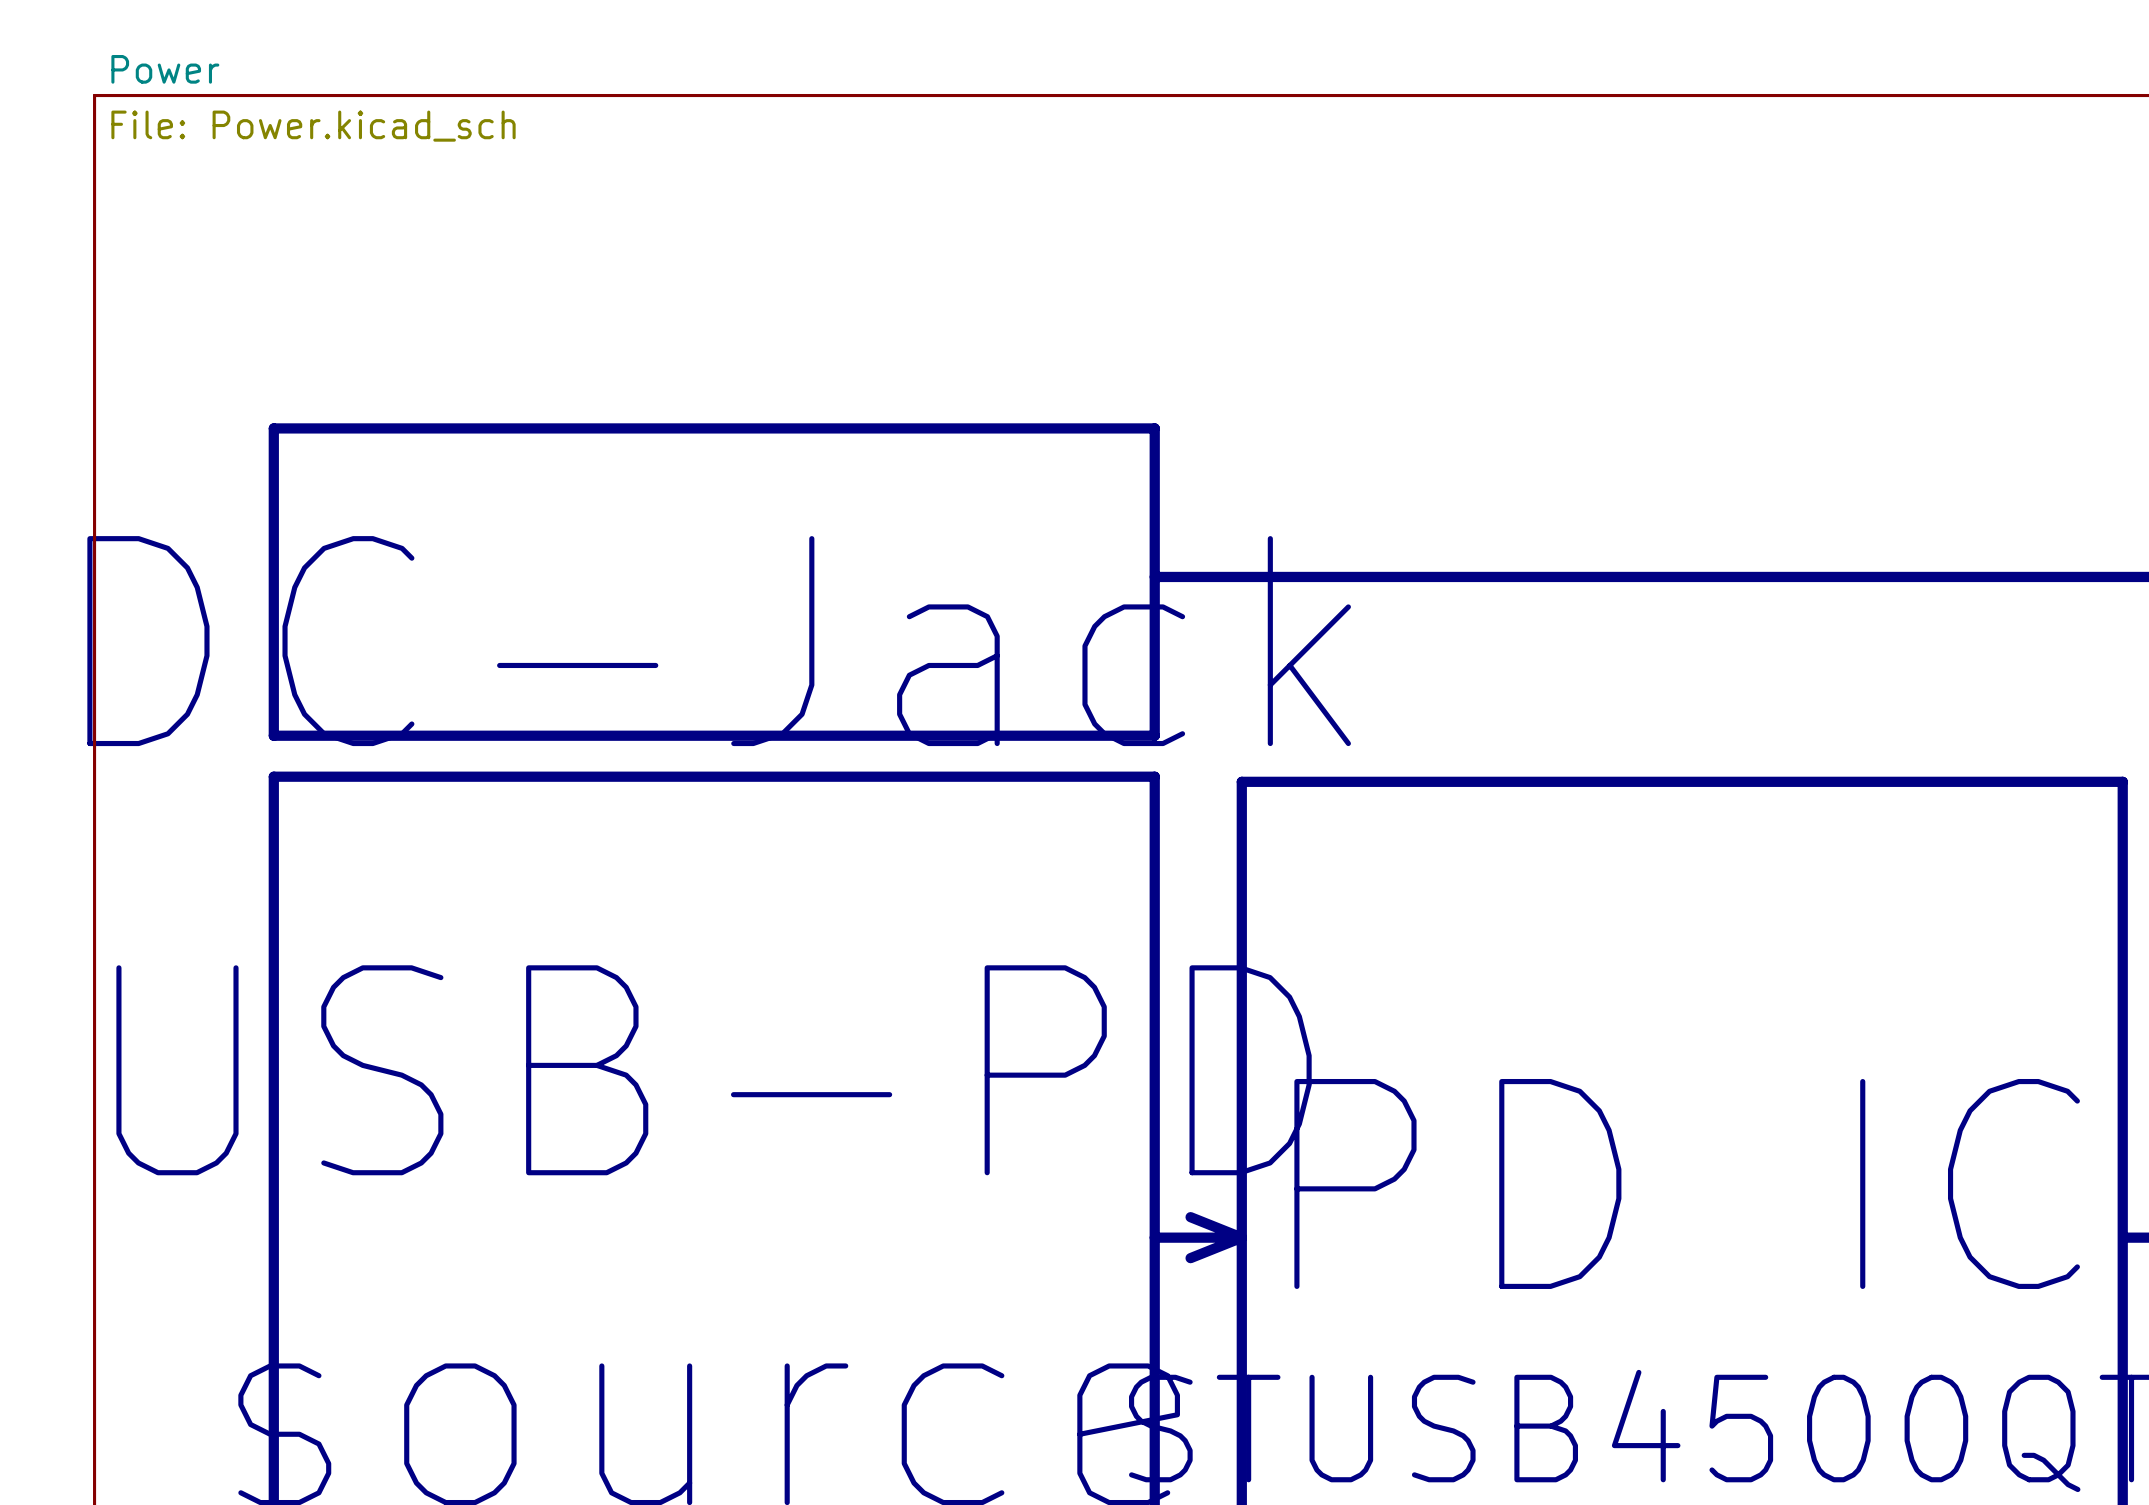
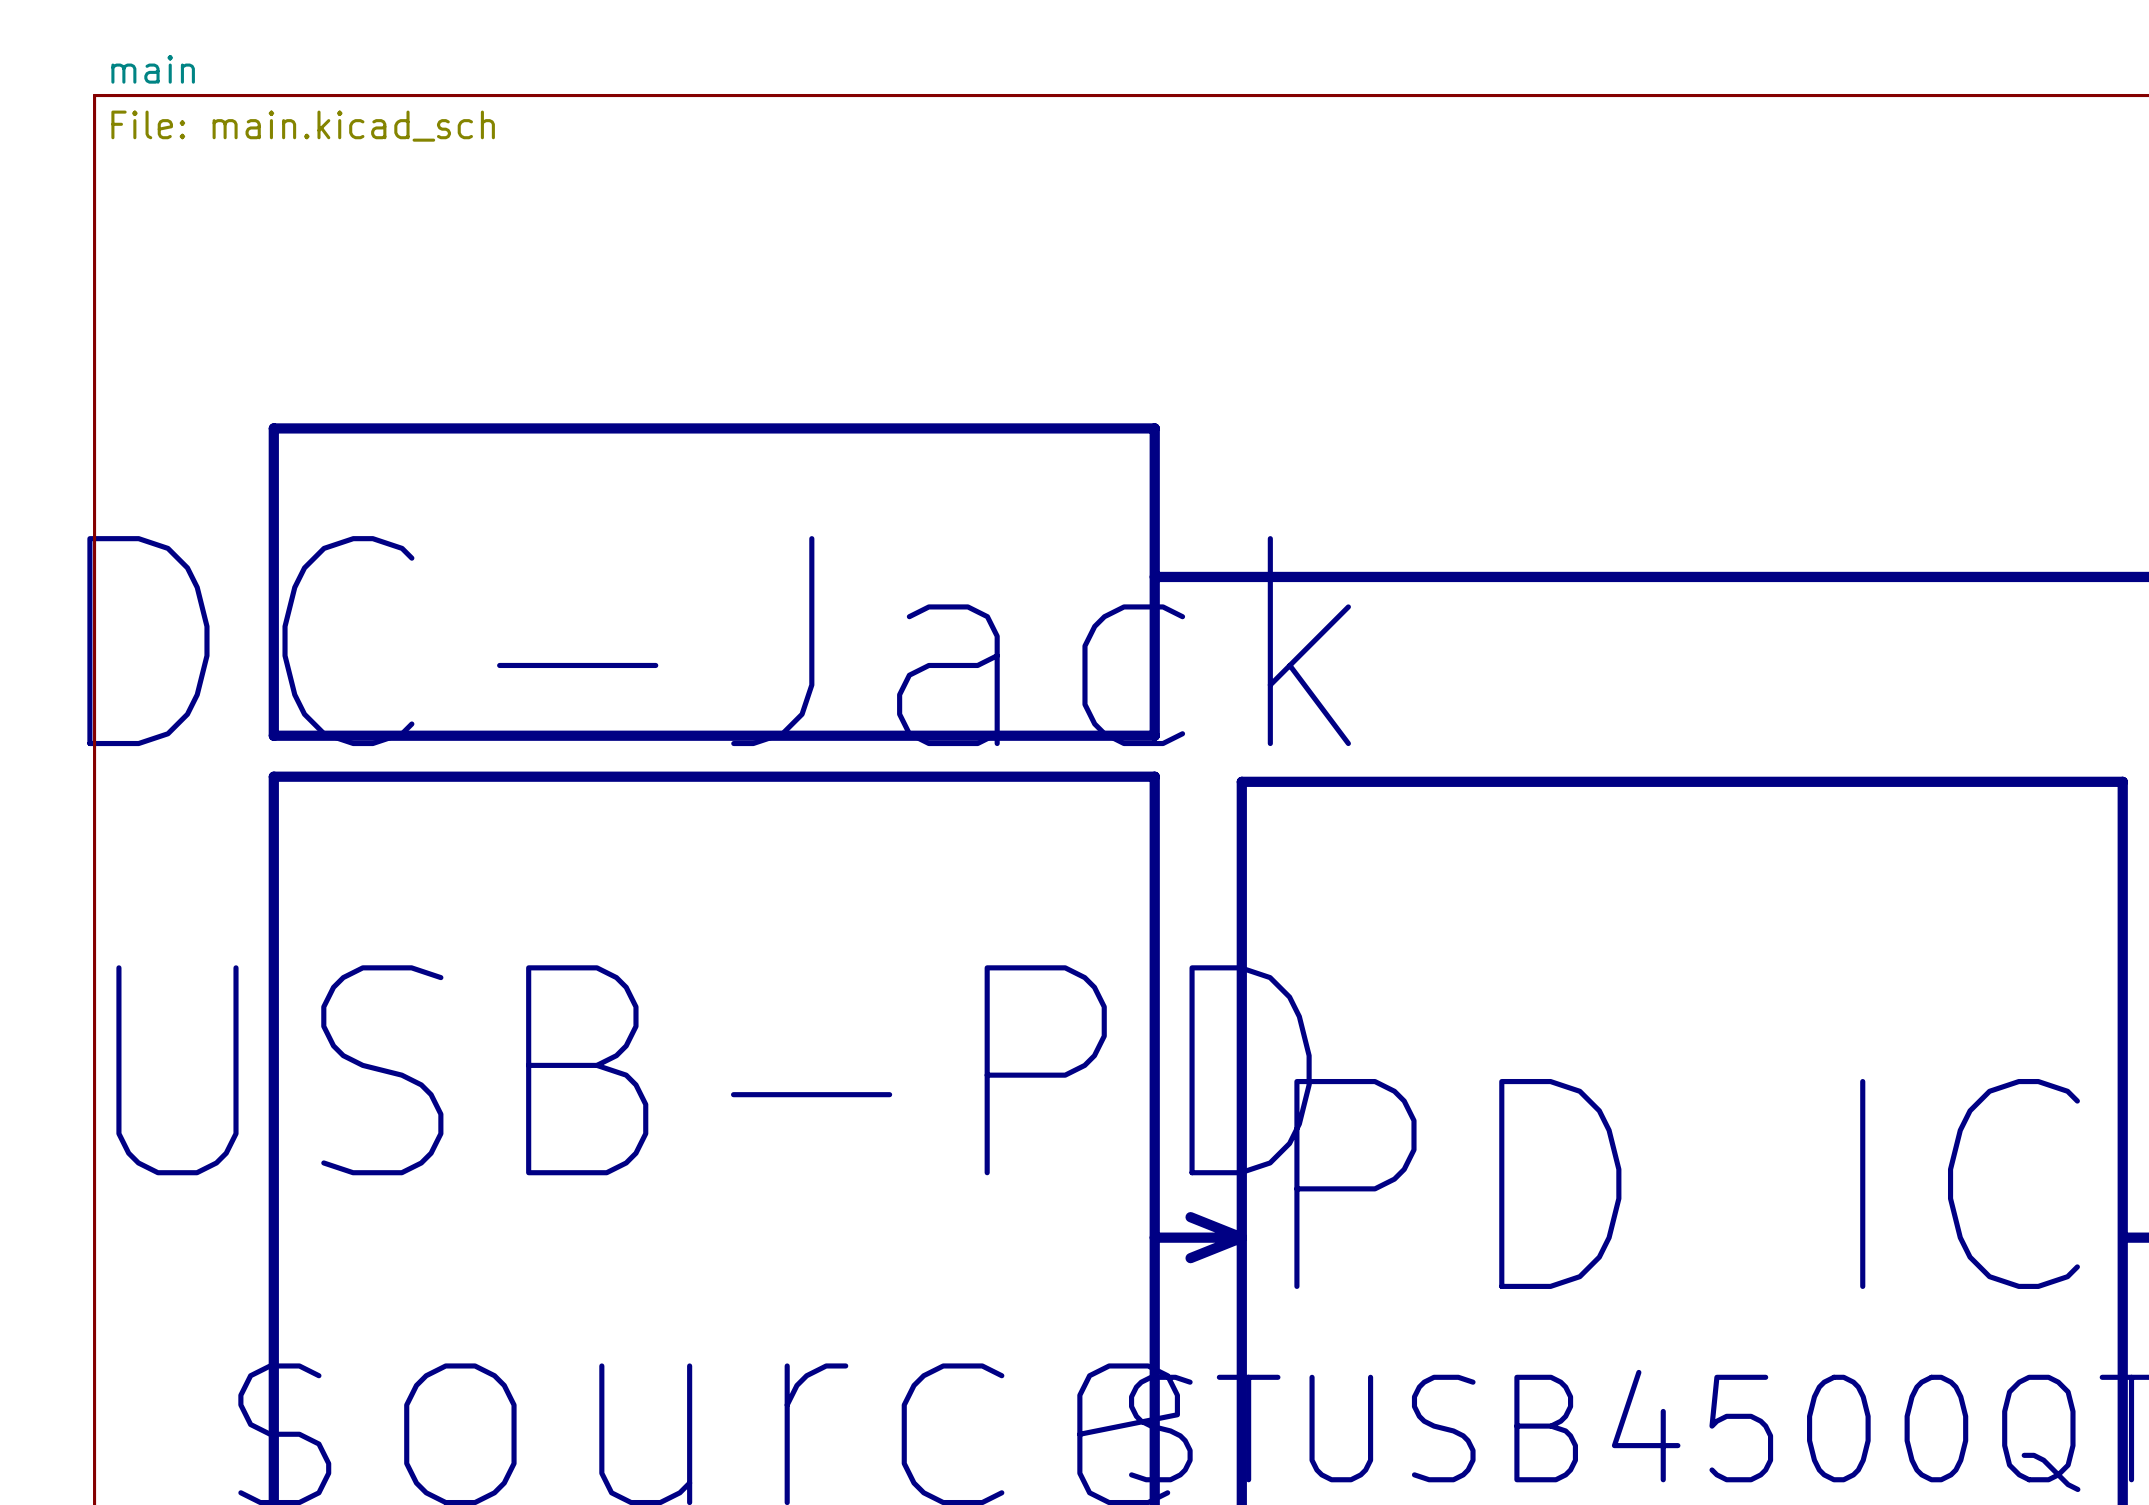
sheet Power name: Power (165, 69) -> main (153, 69)
sheet Power value: File: Power.kicad_sch (313, 126) -> File: main.kicad_sch (303, 126)

